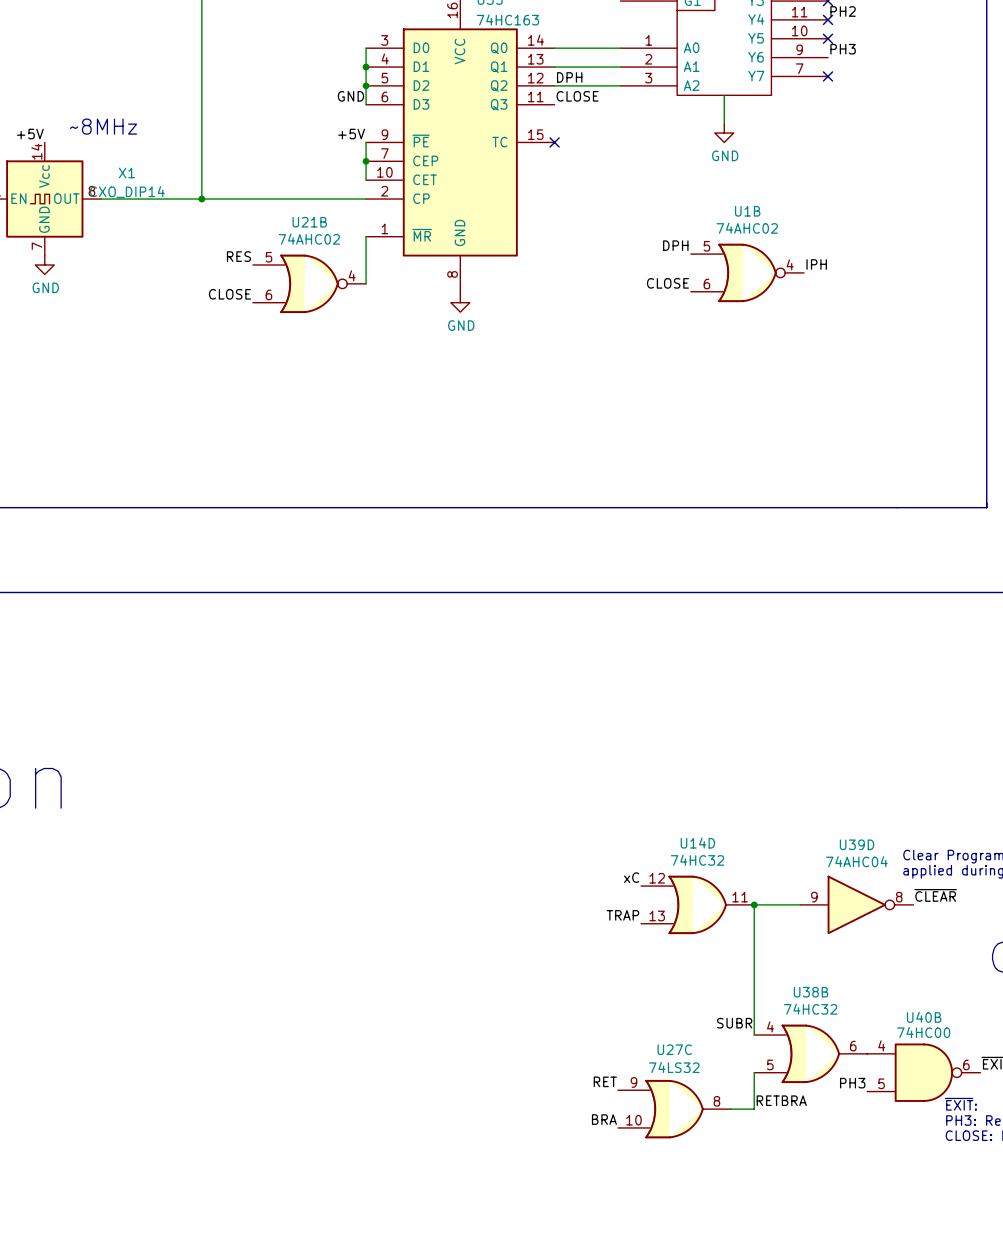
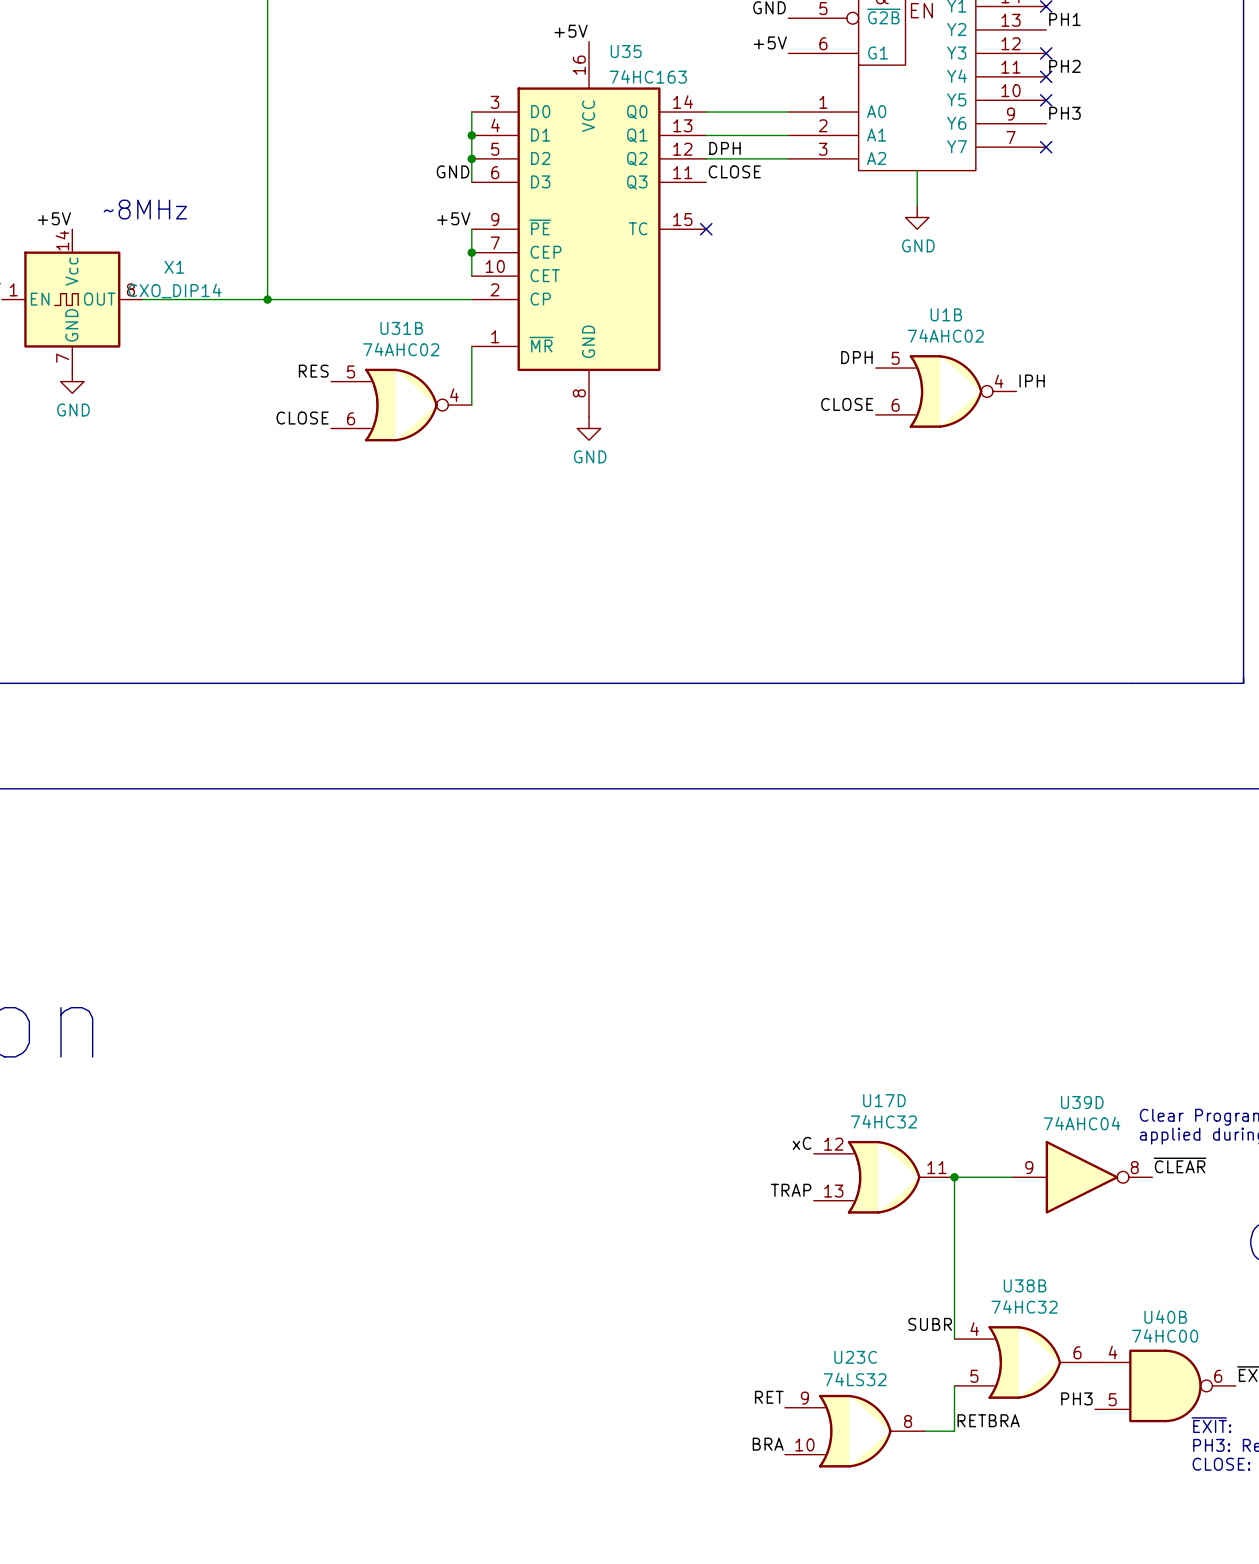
U21B name: U21B (309, 222) -> U31B (401, 328)
U14D name: U14D (697, 843) -> U17D (884, 1100)
U27C name: U27C (674, 1049) -> U23C (855, 1357)

